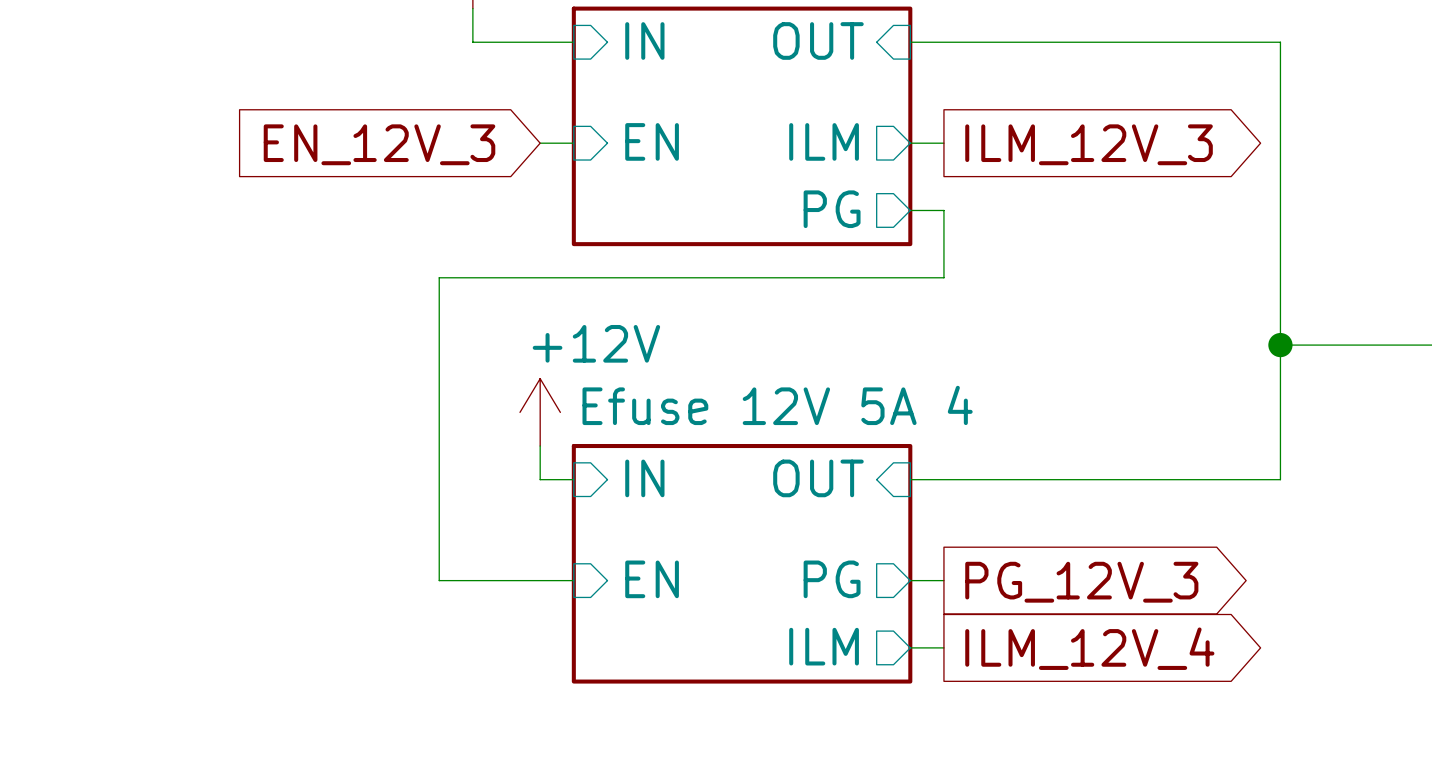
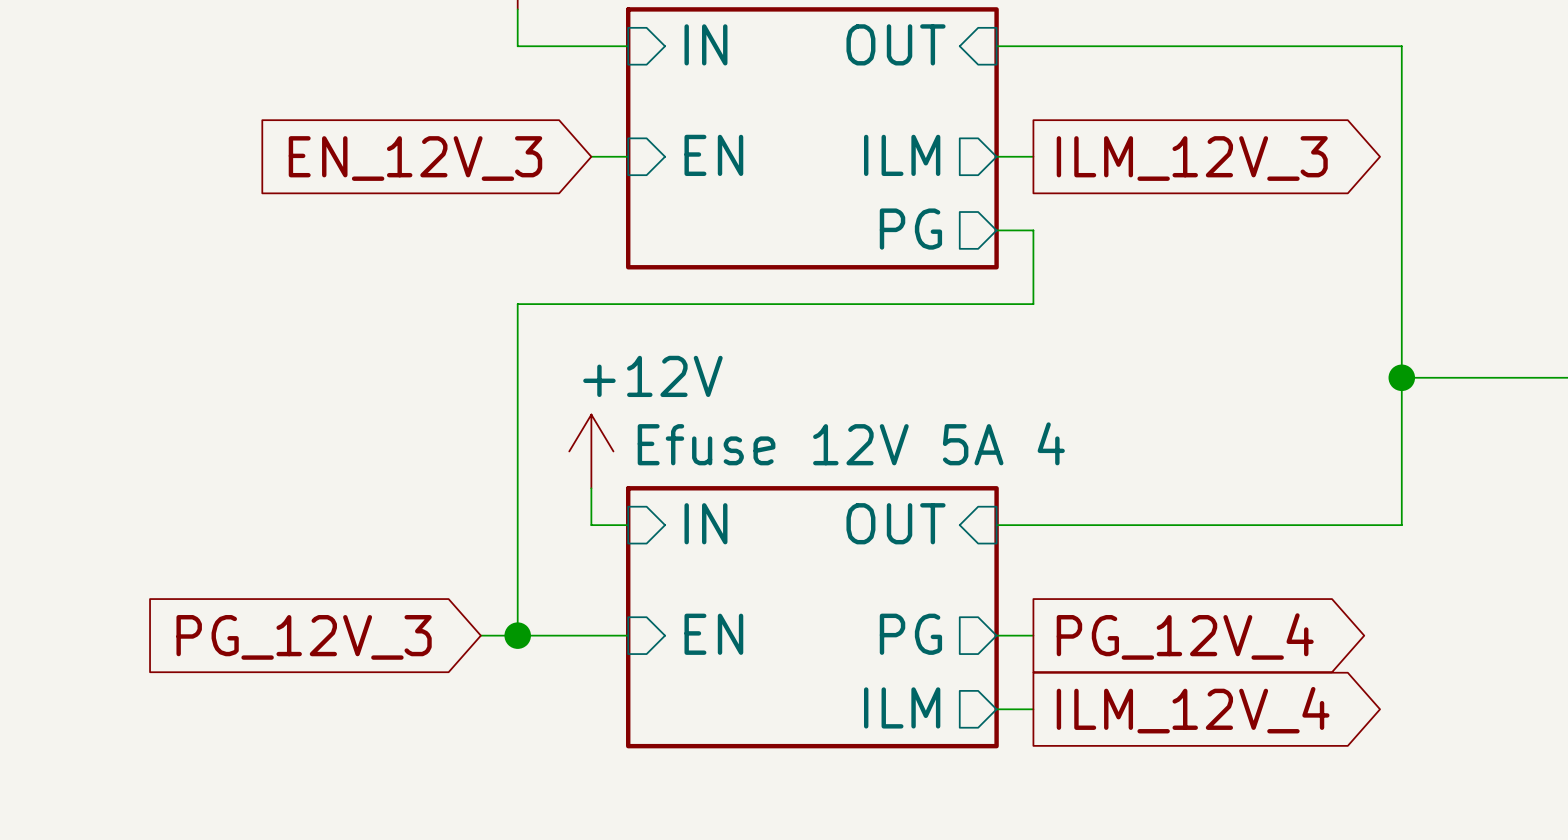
wire: (472, 277) (439, 277) (439, 580) -> (517, 304) (517, 635)
junction: none -> (517, 635)
global label: none -> PG_12V_3 (304, 637)
global label: PG_12V_3 (1081, 582) -> PG_12V_4 (1185, 636)

